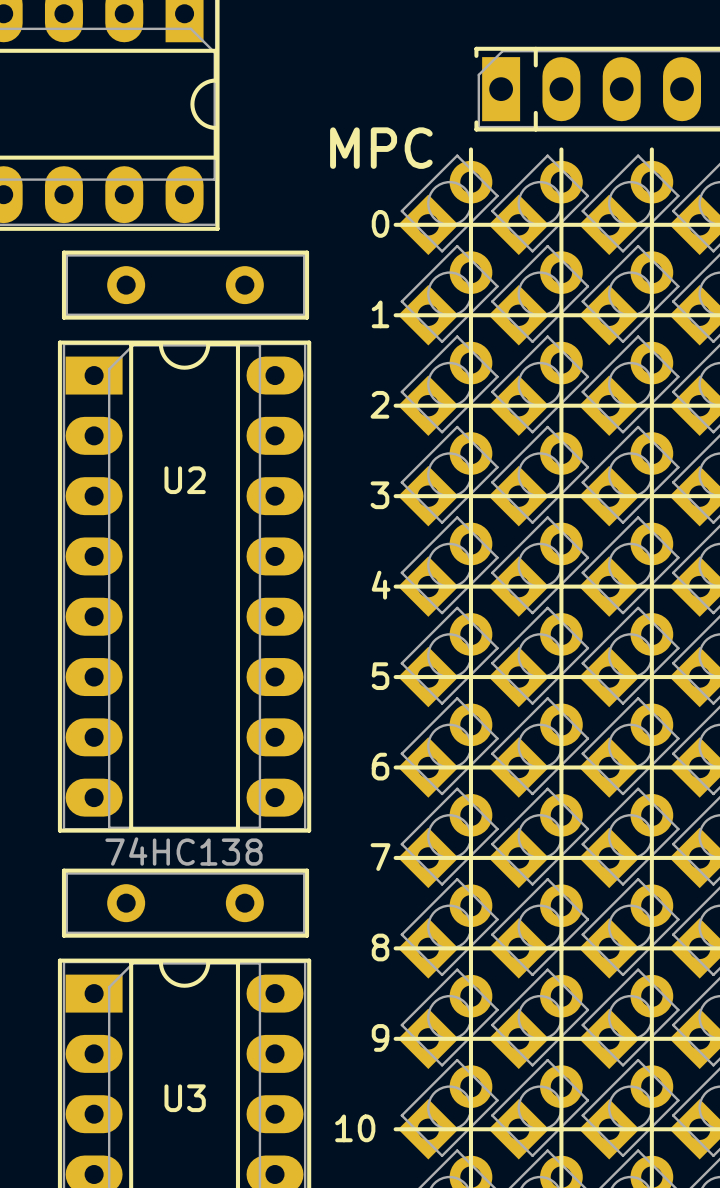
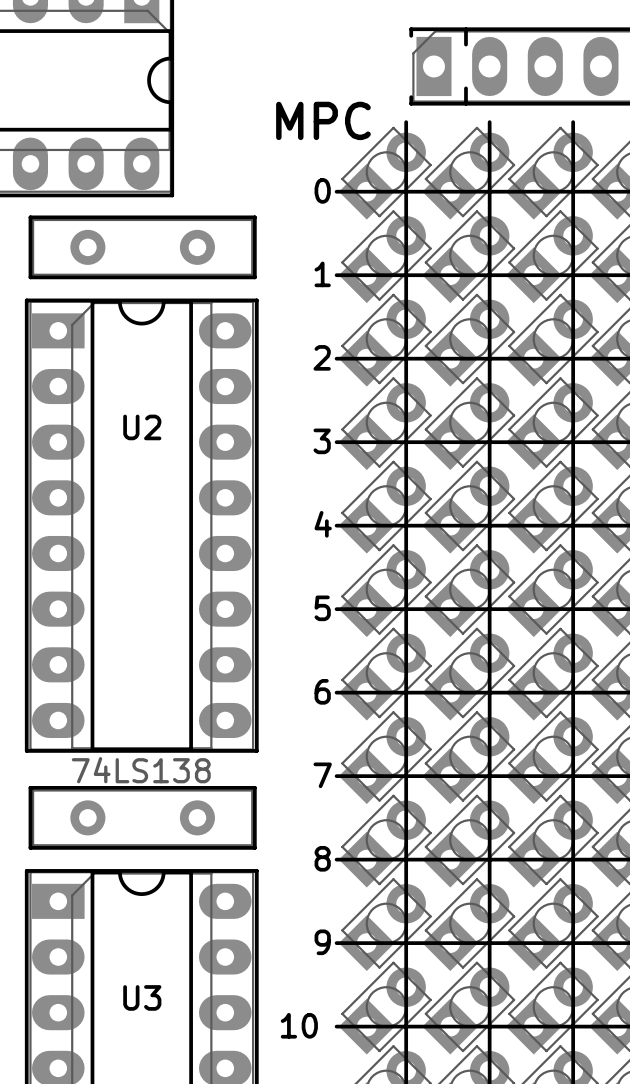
U2 value: 74HC138 (184, 851) -> 74LS138 (141, 770)

